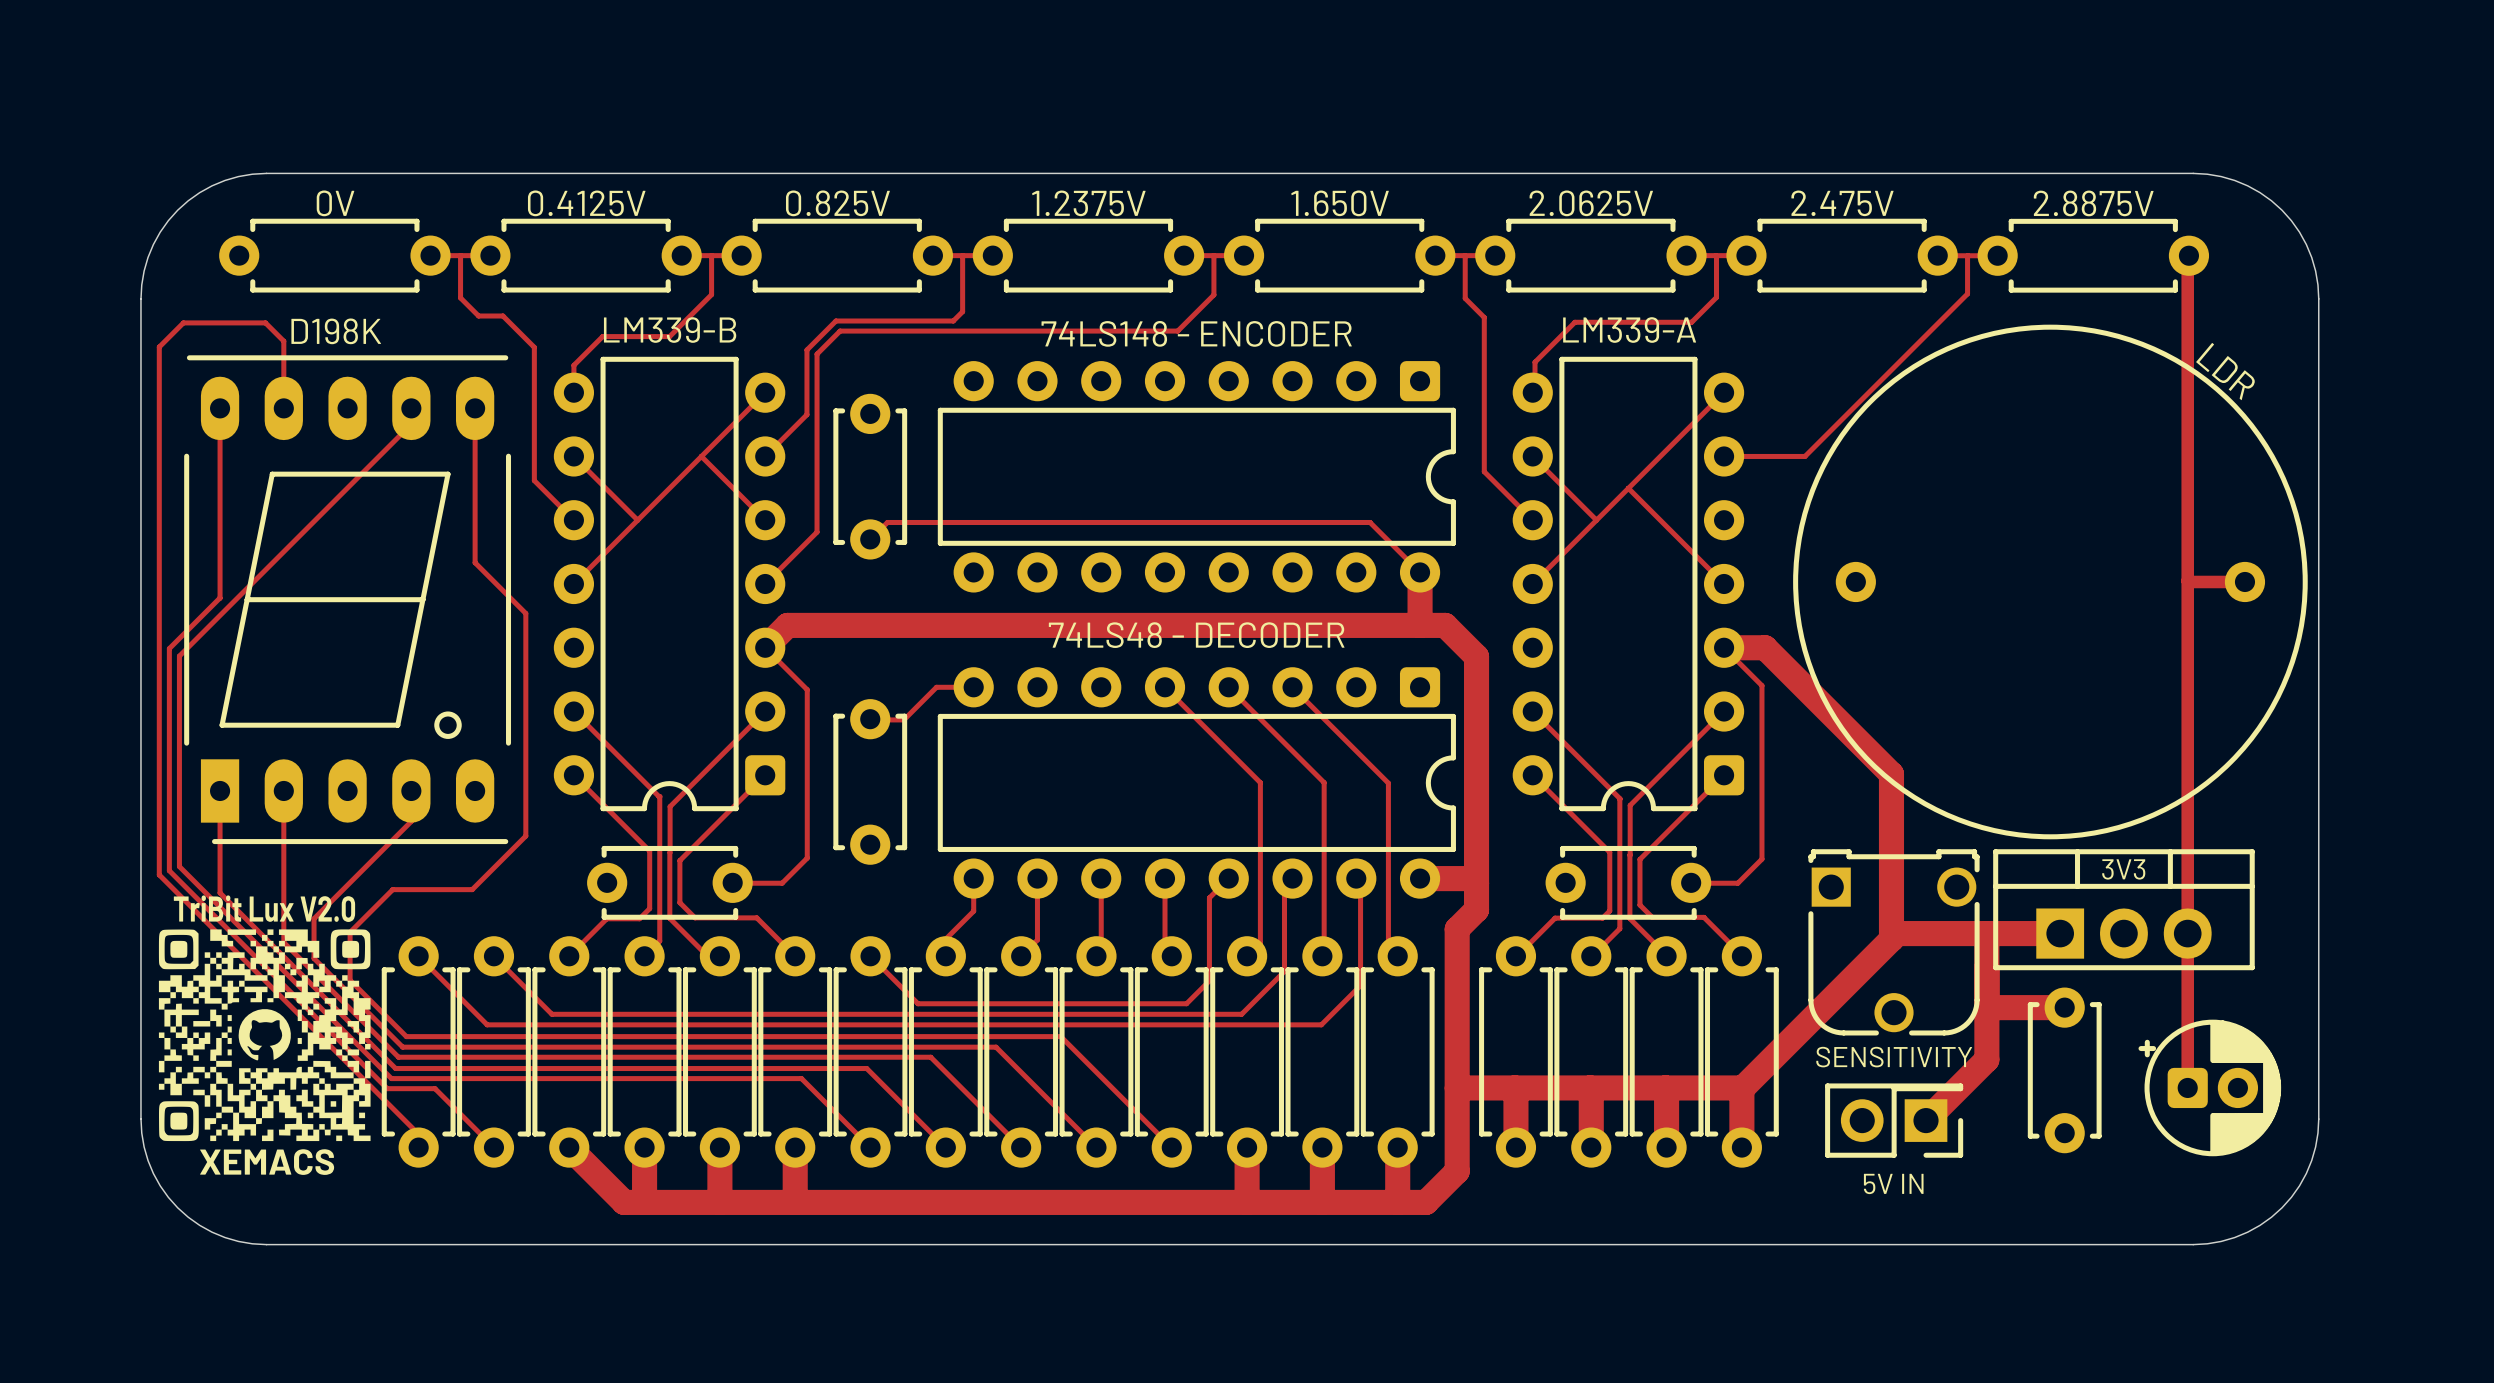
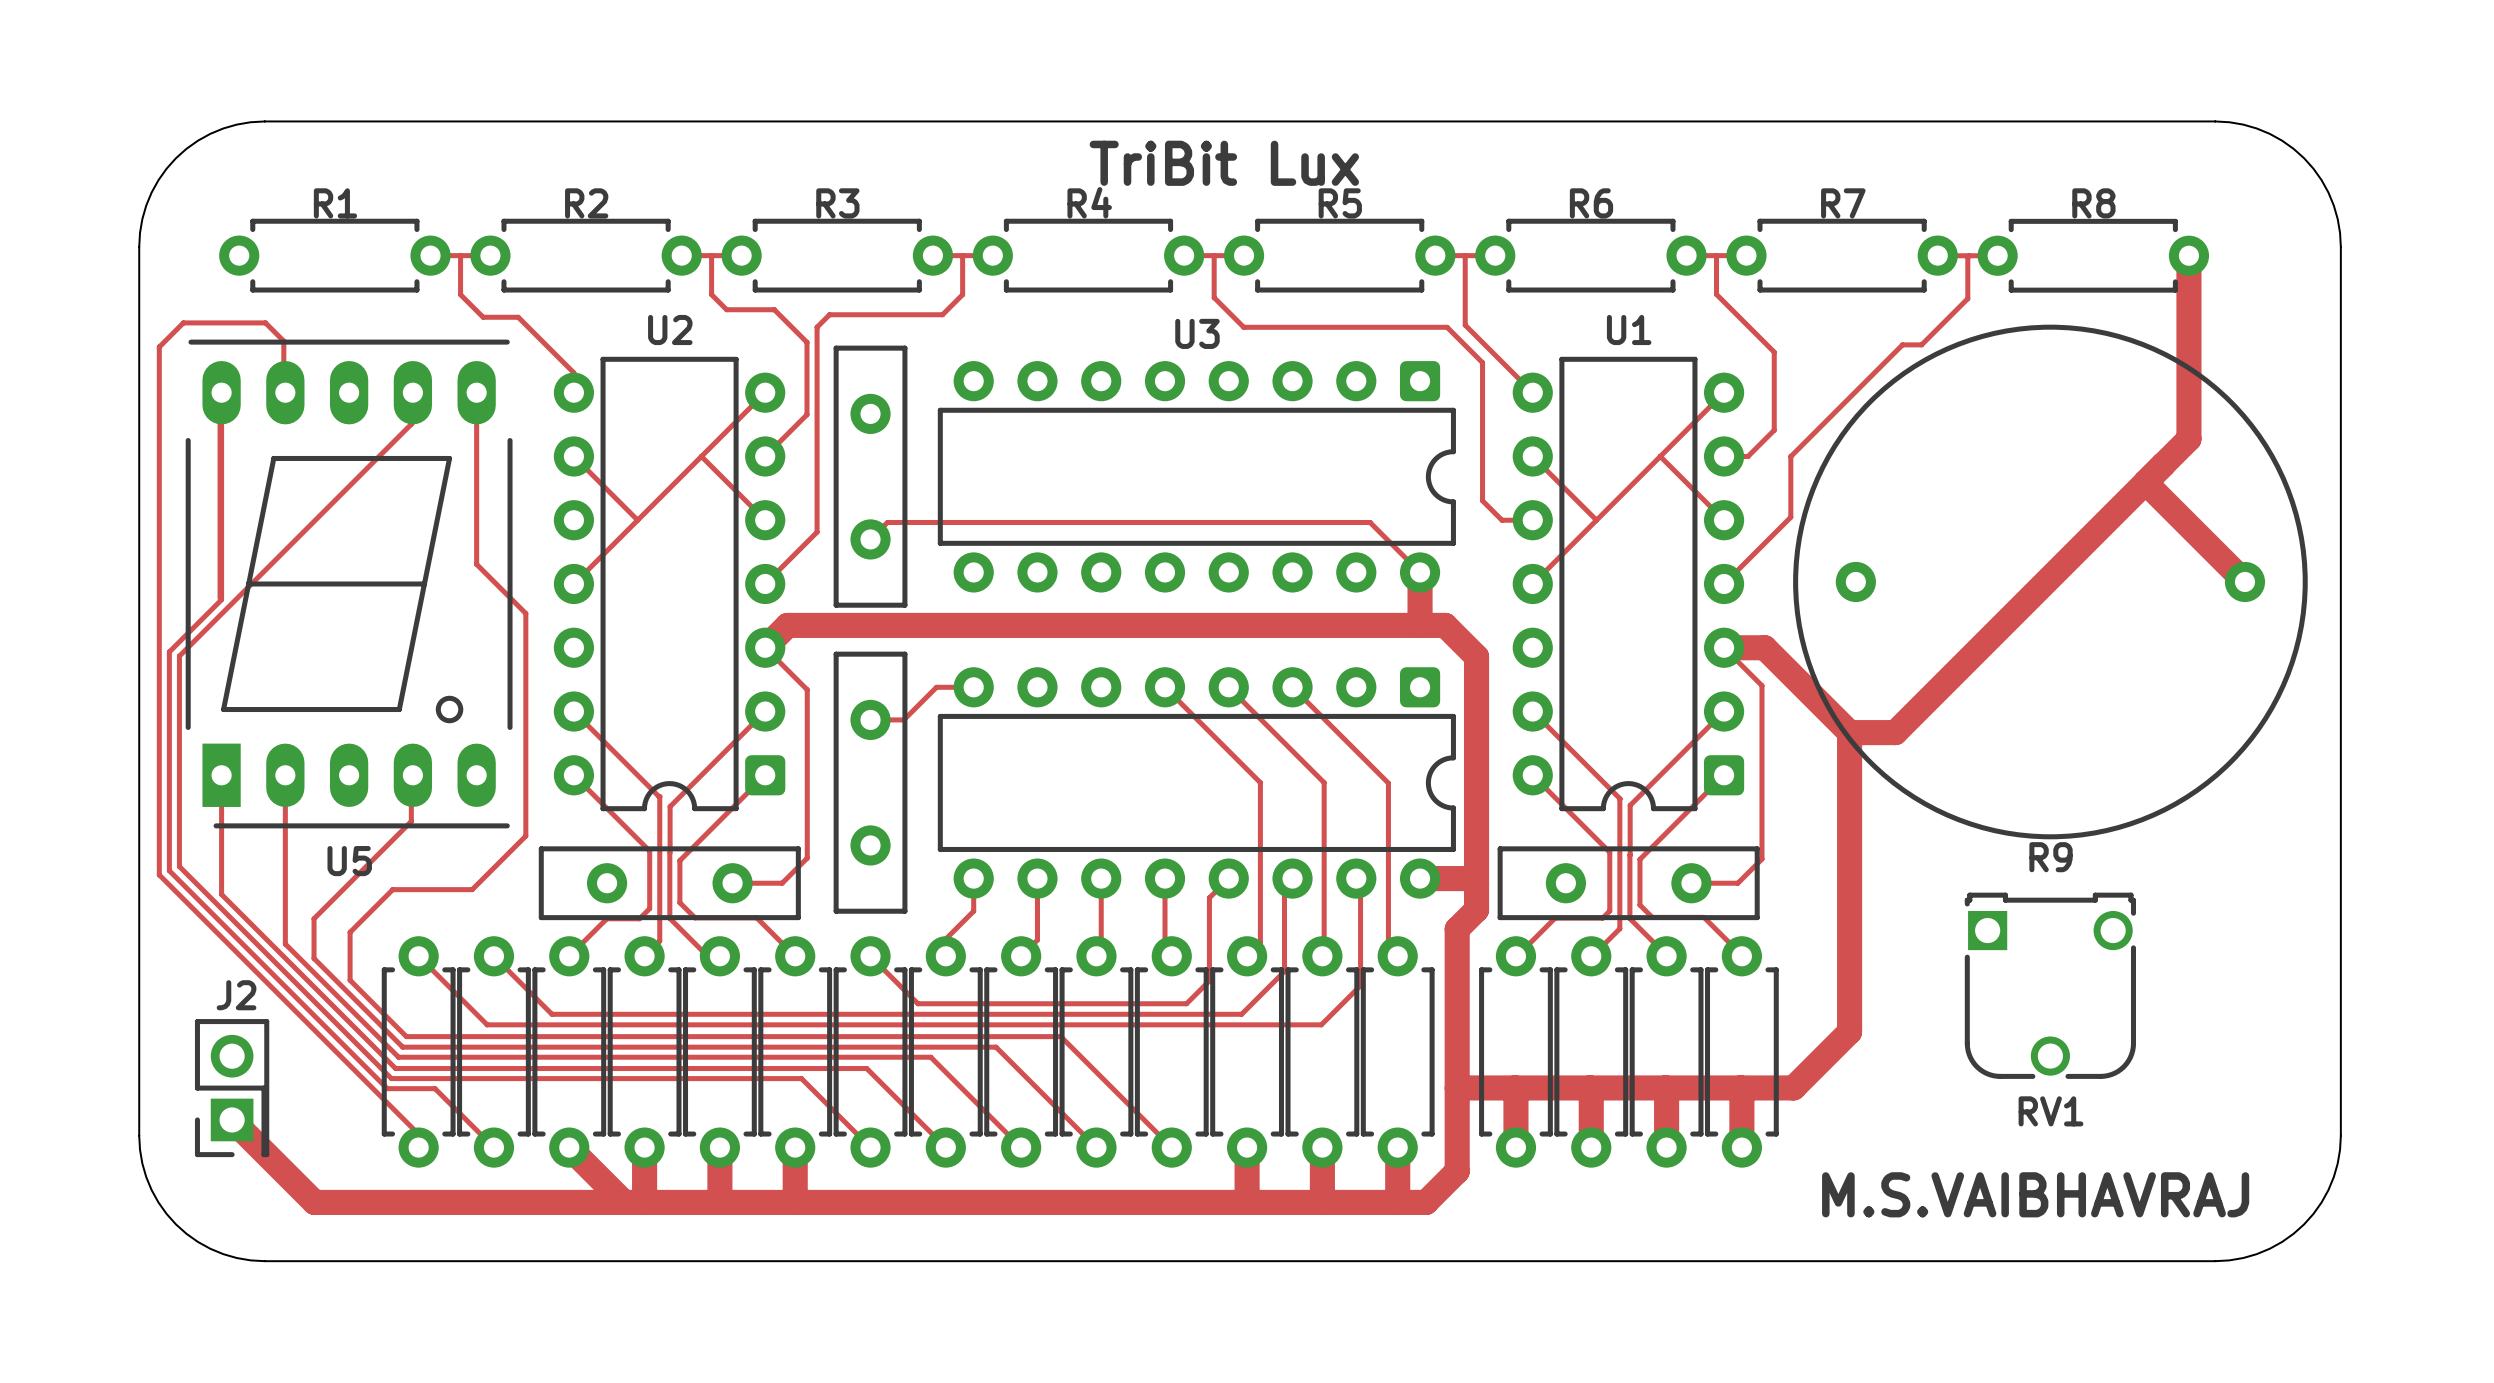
board edge: (266, 173) (2193, 173) (2221, 176) (2247, 185) (2271, 200) (2291, 220) (2306, 244) (2315, 271) (2317, 284) (2318, 1119) (2315, 1147) (2306, 1173) (2291, 1197) (2271, 1217) (2260, 1225) (2234, 1237) (2221, 1241) (2193, 1244) (266, 1244) (238, 1241) (212, 1232) (188, 1217) (168, 1197) (153, 1173) (148, 1160) (141, 1133) (140, 298) (141, 284) (148, 257) (160, 232) (177, 210) (199, 192) (212, 185) (238, 176) (266, 173) -> (264, 121) (250, 122) (223, 128) (197, 140) (175, 158) (158, 180) (151, 192) (142, 219) (139, 246) (140, 1149) (146, 1177) (158, 1202) (166, 1213) (186, 1233) (210, 1248) (236, 1258) (264, 1261) (2215, 1261) (2243, 1258) (2256, 1254) (2282, 1241) (2293, 1233) (2313, 1213) (2328, 1190) (2337, 1163) (2340, 1135) (2340, 246) (2337, 219) (2333, 205) (2321, 180) (2313, 168) (2293, 148) (2269, 133) (2243, 124) (2215, 121) (264, 121)
R1 name: none -> R1 (335, 203)
text: 0V (335, 203) -> none
R2 name: none -> R2 (586, 203)
text: 0.4125V (586, 203) -> none
R3 name: none -> R3 (837, 203)
text: 0.825V (837, 203) -> none
text: 1.2375V (1088, 203) -> TriBit Lux (1224, 163)
R4 name: none -> R4 (1089, 202)
R5 name: none -> R5 (1340, 203)
text: 1.650V (1340, 203) -> none
R6 name: none -> R6 (1591, 203)
text: 2.0625V (1591, 203) -> none
text: 2.475V (1842, 203) -> none
R7 name: none -> R7 (1843, 203)
R8 name: none -> R8 (2093, 203)
text: 2.8875V (2093, 203) -> none
track: (1213, 255) (1213, 294) (1177, 331) (840, 331) (817, 354) -> (1214, 256) (1214, 297) (1243, 327) (1447, 327) (1482, 362) (1482, 500) (1502, 520) (1532, 520)
track: (2188, 255) (2187, 1087) (2190, 1090) -> (2188, 255) (2188, 439) (1895, 732) (1849, 732)
track: (1967, 256) (1967, 293) (1805, 456) (1748, 456) -> none
track: (460, 294) (460, 297) (478, 316) (502, 316) (534, 347) (534, 480) (573, 520) -> (460, 294) (483, 317) (518, 317) (573, 372)
track: (711, 294) (669, 336) (602, 336) (573, 365) (573, 372) -> (711, 294) (726, 309) (774, 309) (806, 342) (806, 349)
track: (962, 294) (962, 311) (953, 321) (835, 321) (806, 349) -> (962, 294) (942, 314) (829, 314) (817, 327) (817, 354)
track: (1716, 294) (1716, 297) (1691, 322) (1574, 322) (1535, 362) (1535, 390) (1532, 392) -> (1716, 294) (1774, 352) (1774, 430) (1748, 456)
track: (1465, 298) (1484, 317) (1484, 471) (1532, 520) -> (1465, 298) (1465, 325) (1532, 392)
U2 name: none -> U2 (670, 330)
text: LM339-B (670, 330) -> none
U1 name: none -> U1 (1629, 330)
text: LM339-A (1629, 330) -> none
text: D198K (336, 331) -> none
text: 74LS148 - ENCODER (1196, 333) -> none
U3 name: none -> U3 (1197, 333)
text: LDR (2225, 371) -> none
part footprint: [833, 393, 908, 560] -> [833, 345, 908, 608]
track: (475, 408) (475, 562) (476, 564) -> (476, 392) (476, 564)
track: none -> (1660, 456) (1724, 520)
track: (1628, 488) (1724, 583) -> (1969, 255) (1967, 298) (1921, 344) (1902, 344) (1790, 456) (1790, 517) (1724, 583)
track: (2187, 580) (2244, 581) -> (2145, 482) (2244, 581)
track: (219, 598) (169, 648) (169, 651) -> (221, 392) (221, 599) (169, 651)
U5 position: (347, 599) -> (349, 583)
text: 74LS48 - DECODER (1196, 635) -> none
track: (1765, 647) (1891, 774) (1891, 939) -> (1764, 647) (1849, 732)
part footprint: [833, 699, 908, 865] -> [833, 651, 908, 914]
track: (220, 790) (220, 892) (221, 894) -> (221, 775) (221, 894)
track: (283, 790) (283, 942) (285, 944) -> (285, 775) (285, 944)
part footprint: [587, 845, 753, 920] -> [538, 846, 801, 921]
part footprint: [1545, 845, 1712, 920] -> [1497, 846, 1760, 921]
R9 name: none -> R9 (2051, 857)
U5 name: none -> U5 (349, 861)
text: 3V3 (2123, 869) -> none
text: TriBit Lux V2.0 (264, 908) -> none
part: (2123, 909) -> none
drawing: [158, 929, 371, 1142] -> none
track: (1986, 933) (1986, 1059) (1926, 1120) -> none
track: (2060, 933) (1897, 933) (1742, 1087) -> (1849, 732) (1849, 1031) (1793, 1087) (1742, 1087)
part: (1894, 942) -> none
RV1: none -> (2050, 985)
track: (1986, 1007) (2064, 1007) -> none
text: SENSITIVITY (1894, 1057) -> none
part: (2064, 1070) -> none
part: (2209, 1087) -> none
J2: none -> (232, 1088)
track: none -> (232, 1119) (314, 1202) (624, 1202)
part: (1894, 1120) -> none
text: XEMACS (267, 1162) -> none
text: 5V IN (1893, 1183) -> none
text: none -> M.S.VAIBHAVRAJ (2035, 1194)

